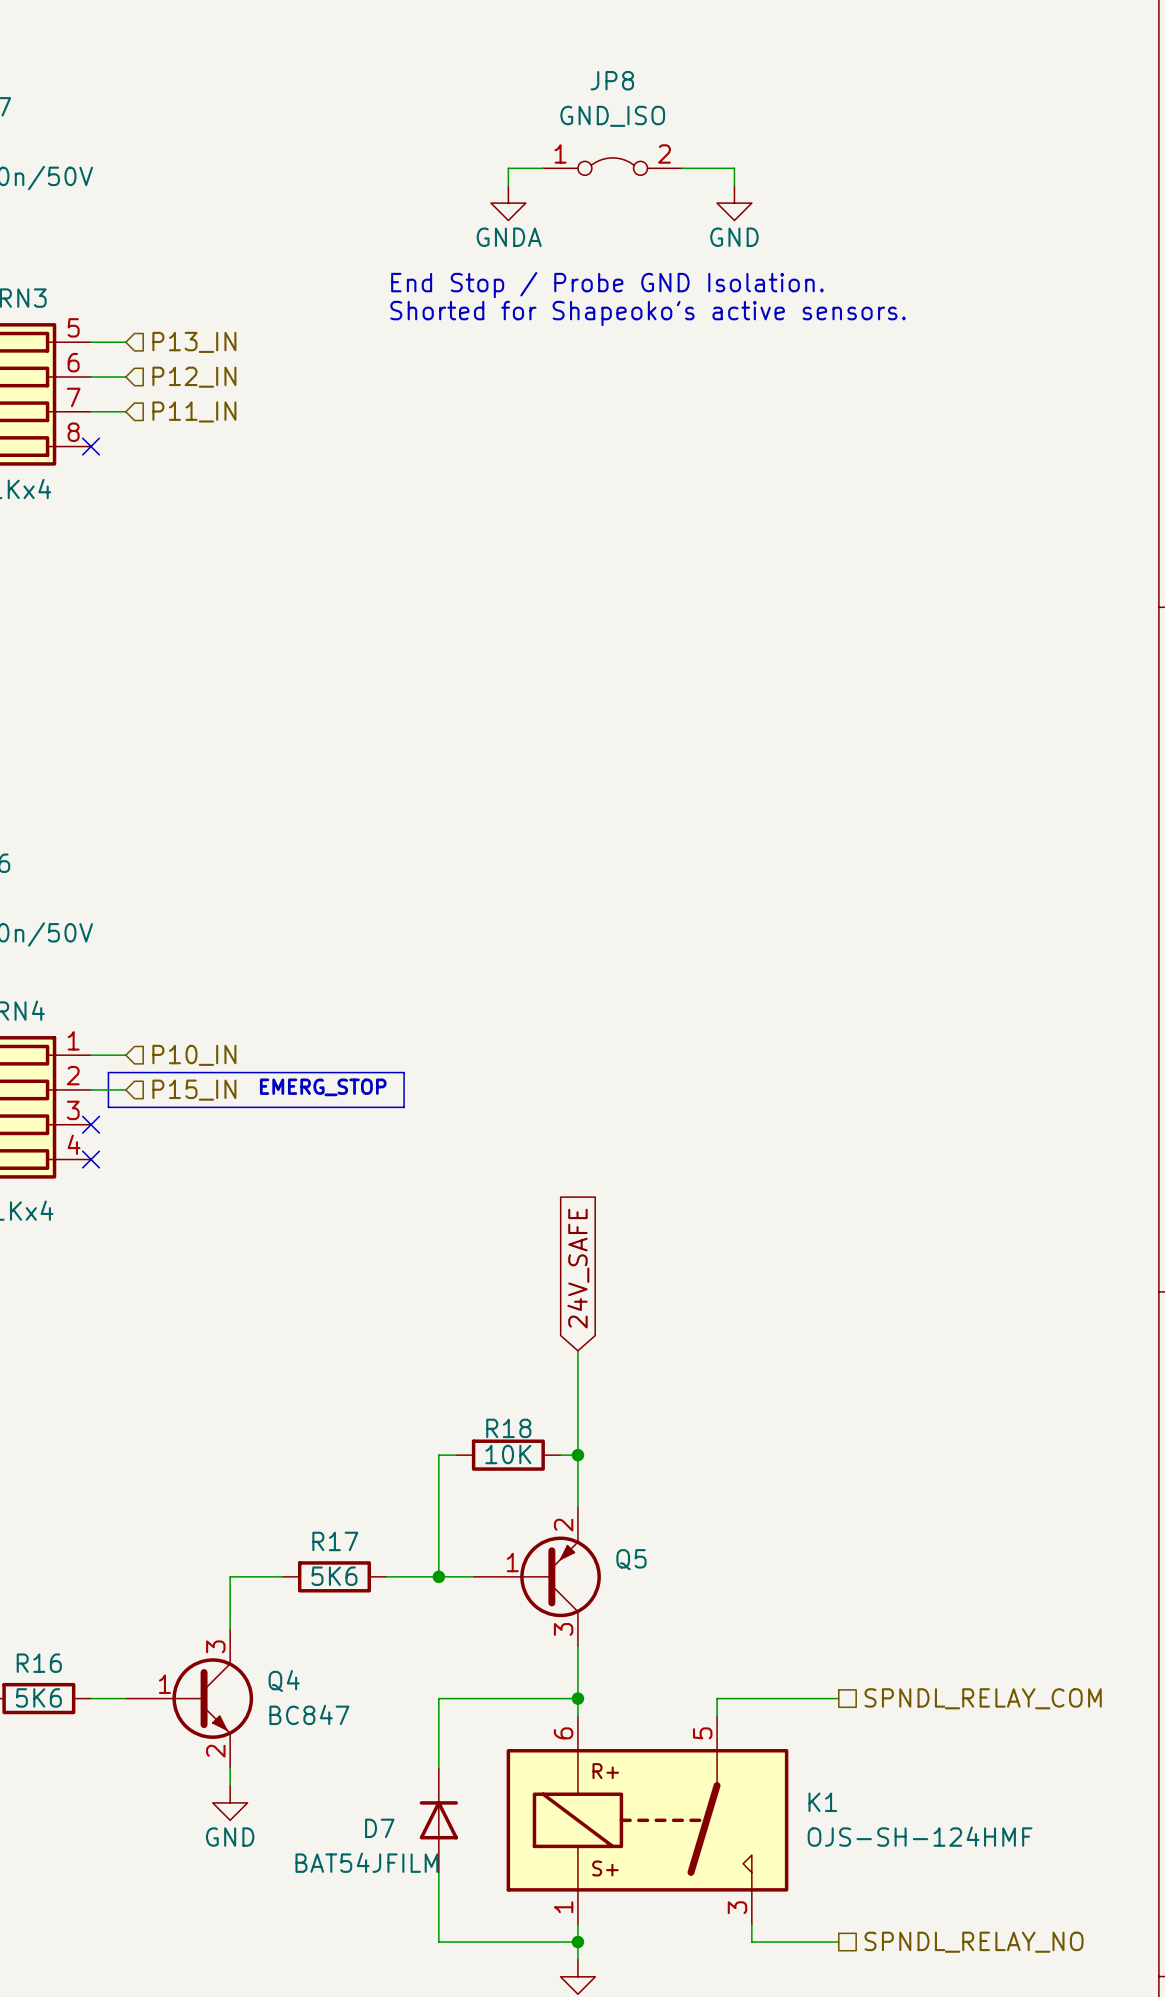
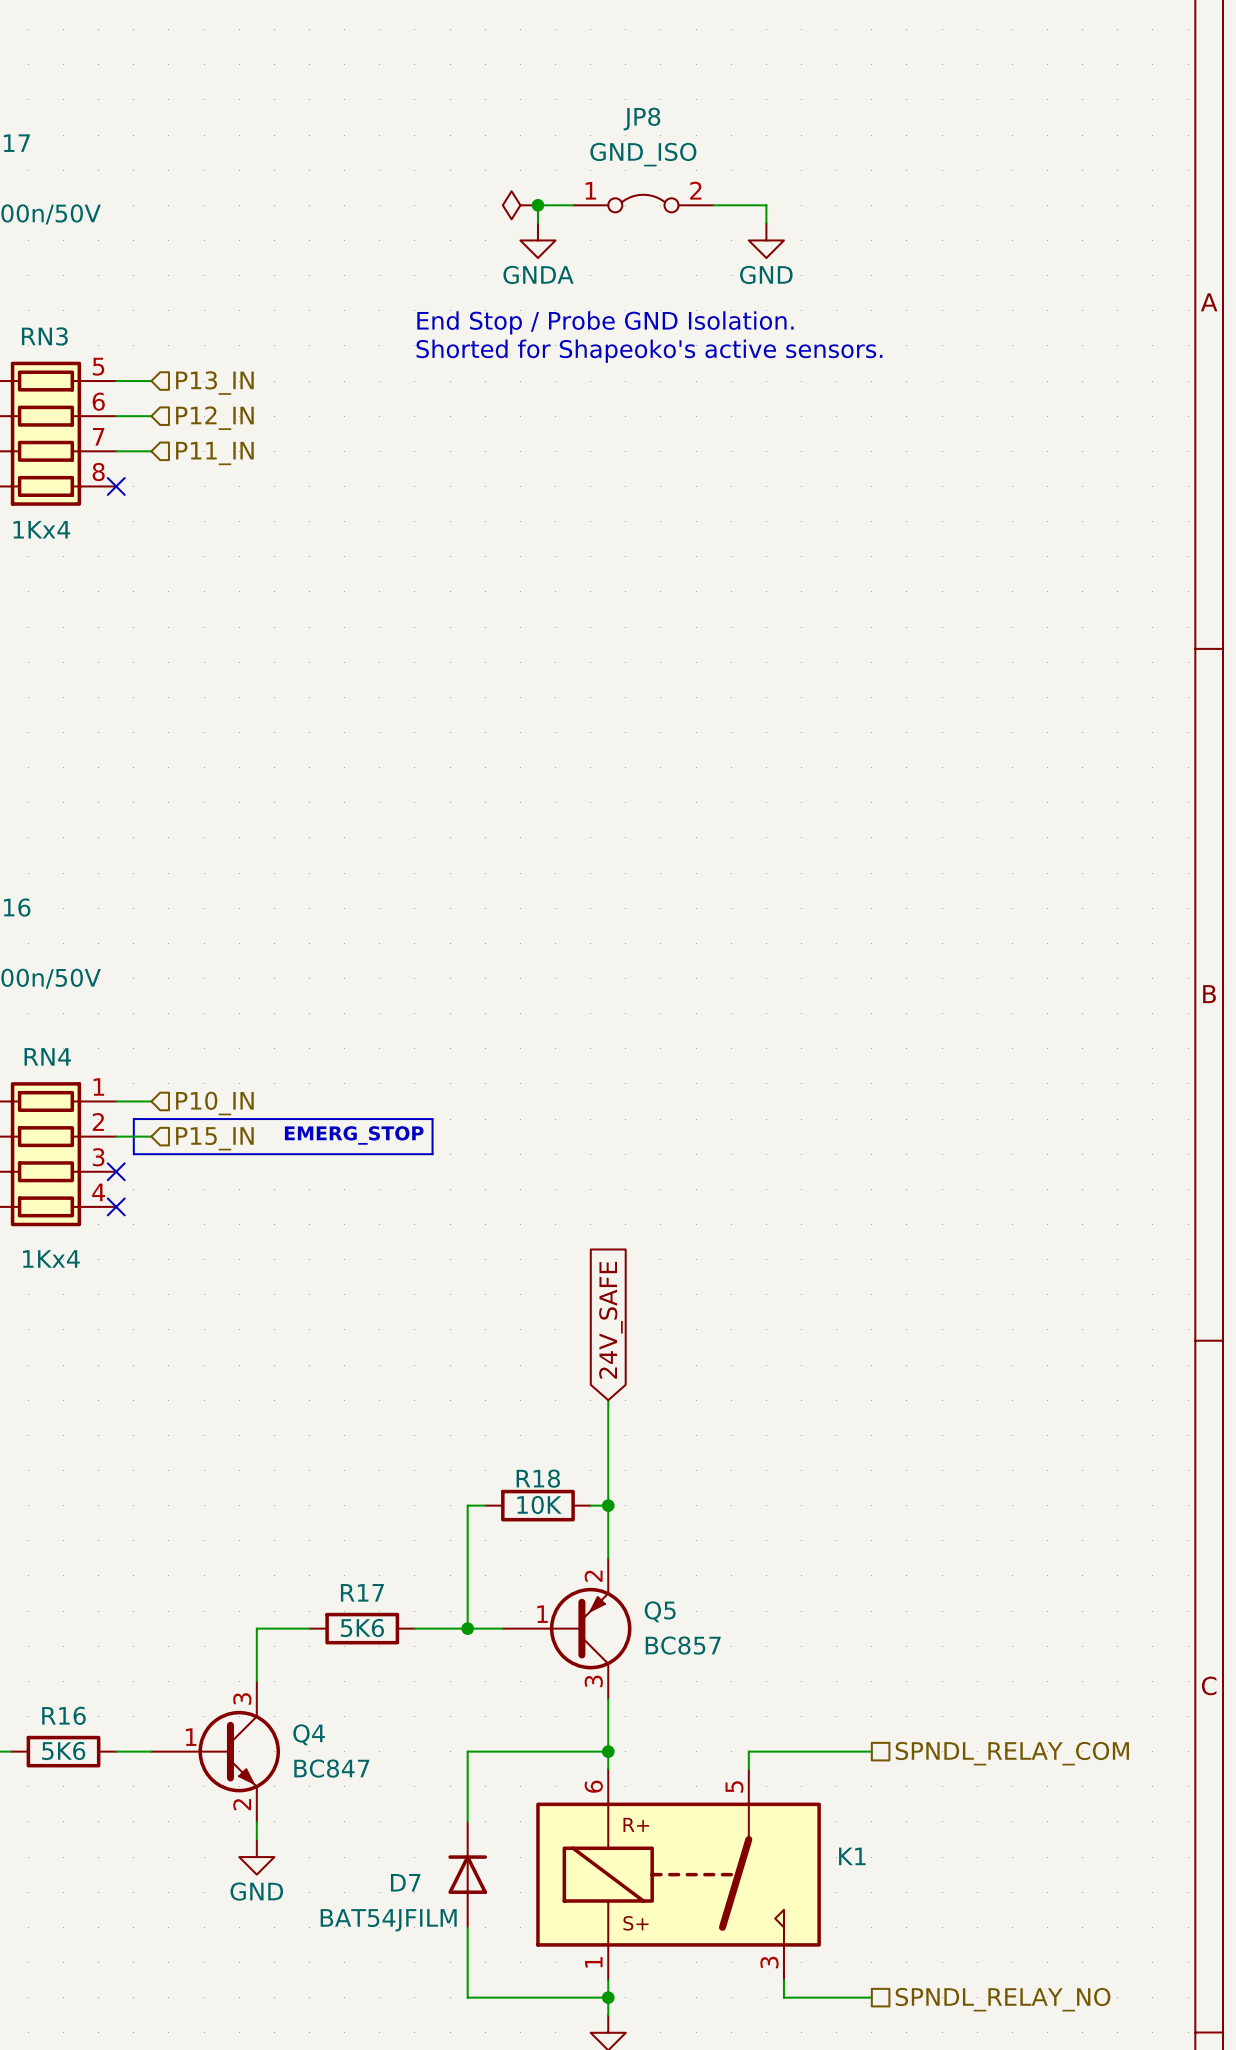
power symbol: none -> (520, 205)
junction: none -> (537, 205)
Q5 value: none -> BC857 (683, 1645)
K1 value: OJS-SH-124HMF (920, 1836) -> none

